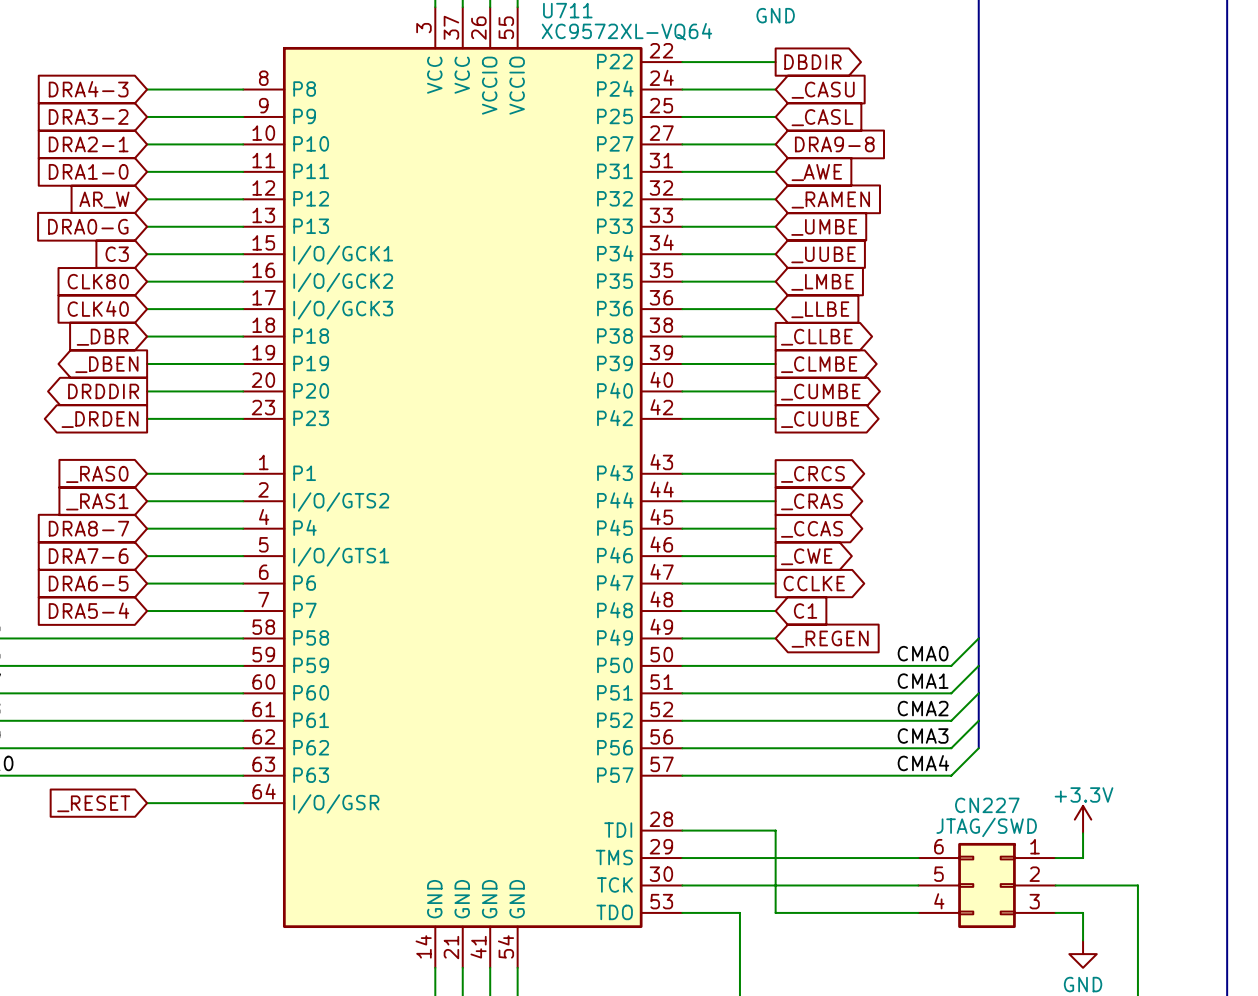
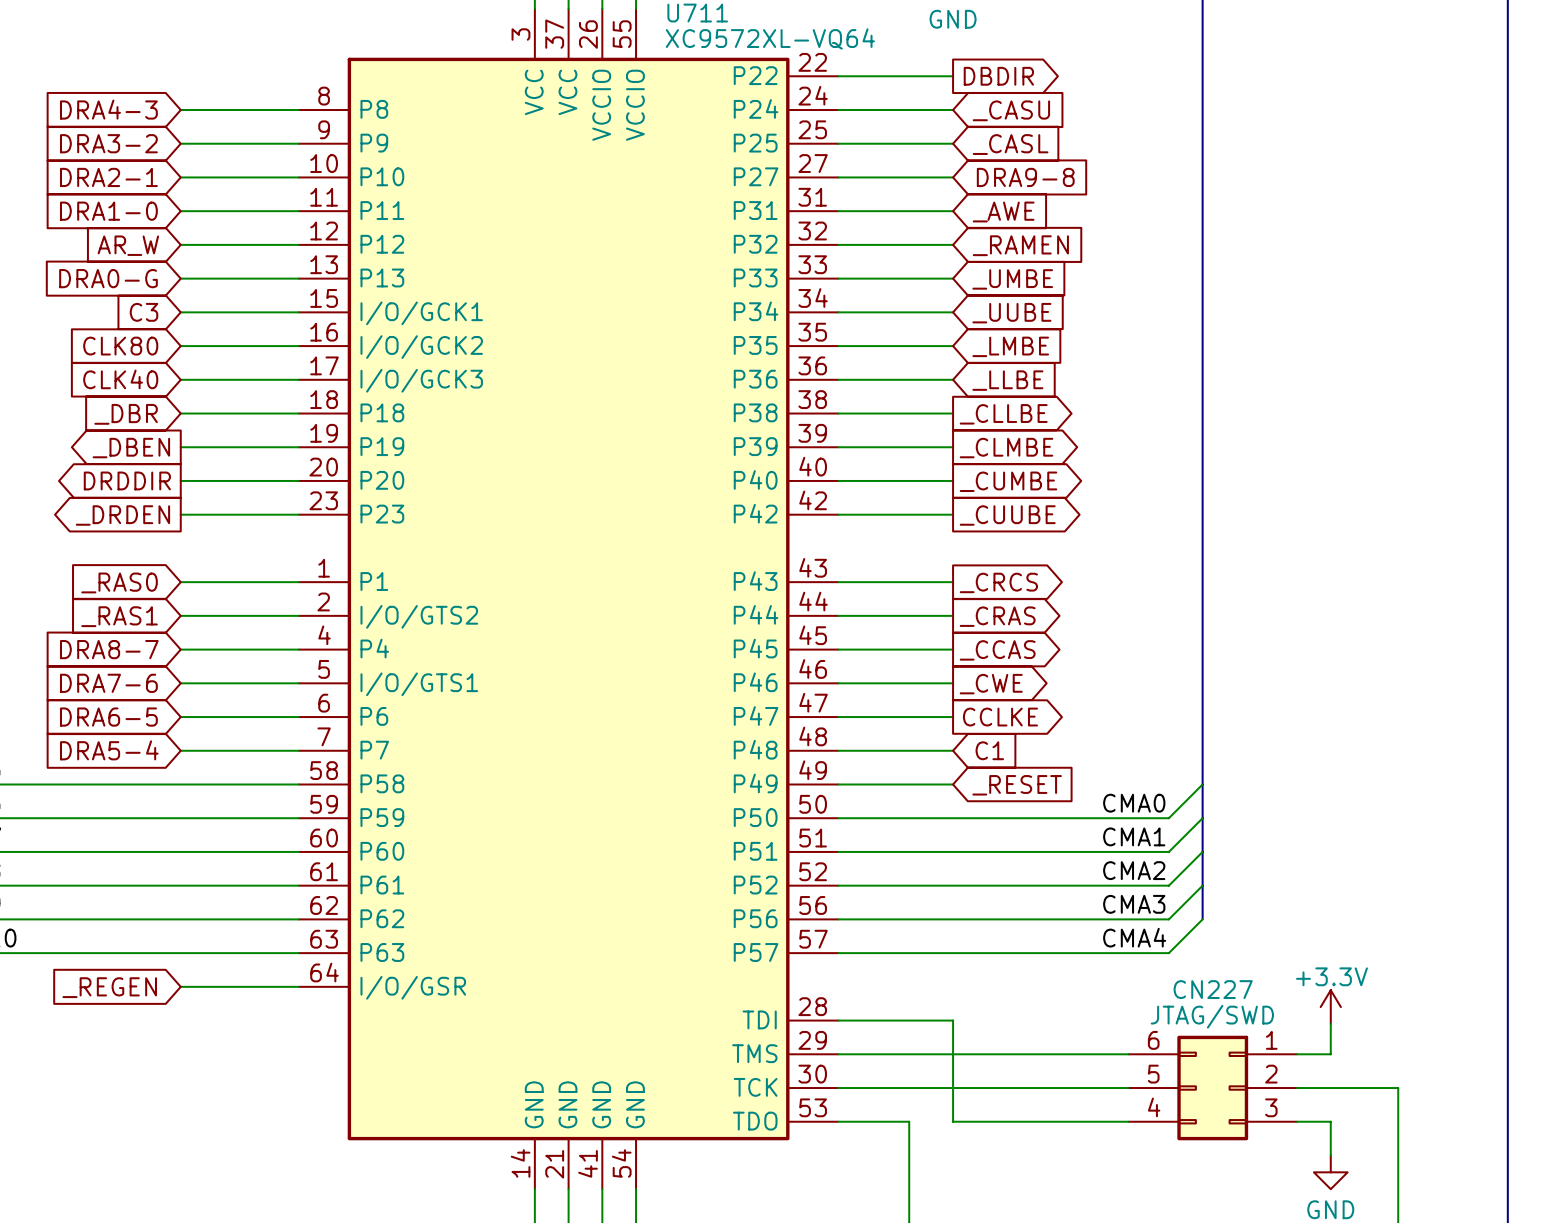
global label: _REGEN (830, 639) -> _RESET (1017, 785)
global label: _RESET (93, 803) -> _REGEN (109, 987)

